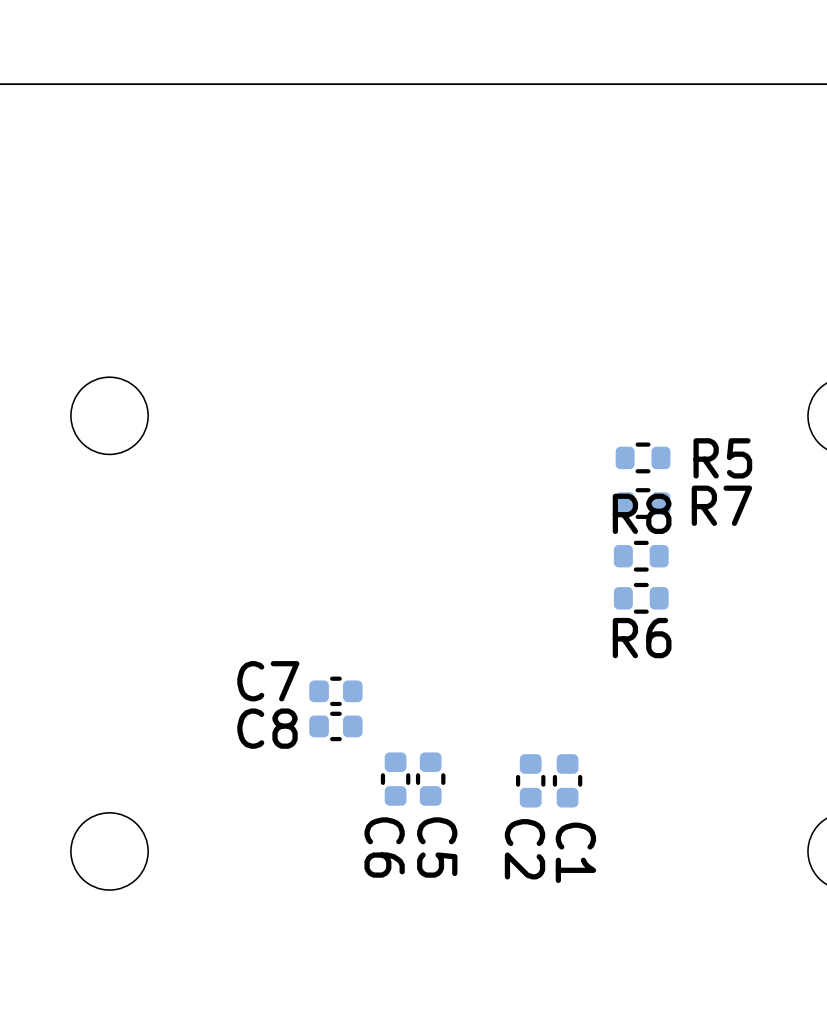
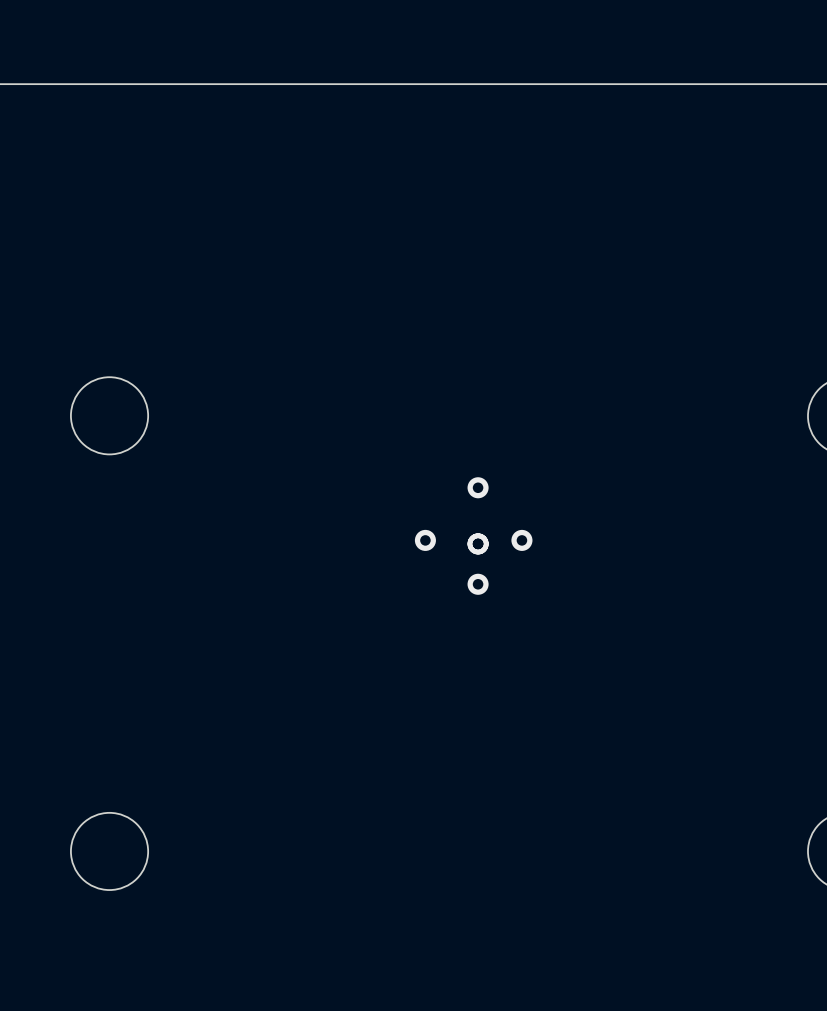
R5: (643, 457) -> none
via: none -> (478, 487)
R7: (643, 503) -> none
via: none -> (425, 540)
via: none -> (521, 540)
via: none -> (478, 543)
R8: (641, 556) -> none
via: none -> (478, 584)
R6: (641, 598) -> none
C7: (335, 691) -> none
C8: (335, 726) -> none
C6: (395, 779) -> none
C5: (430, 779) -> none
C2: (530, 780) -> none
C1: (567, 780) -> none

